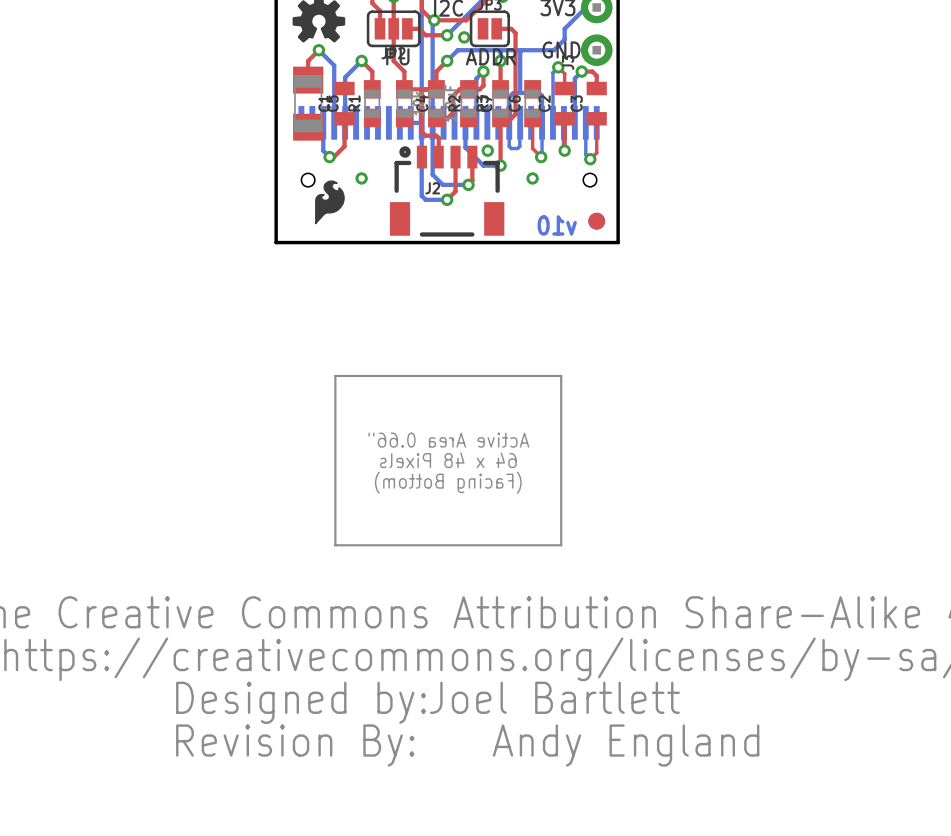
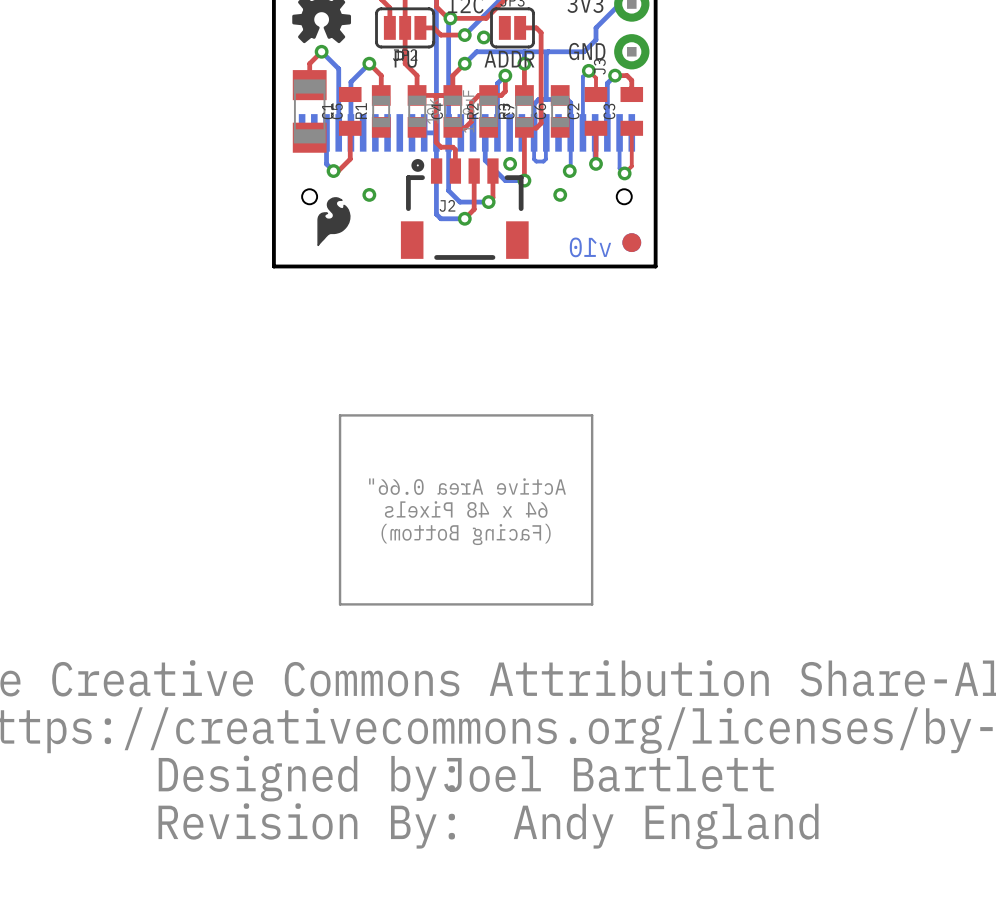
top track: (532, 117) (532, 148) (541, 157) -> none

